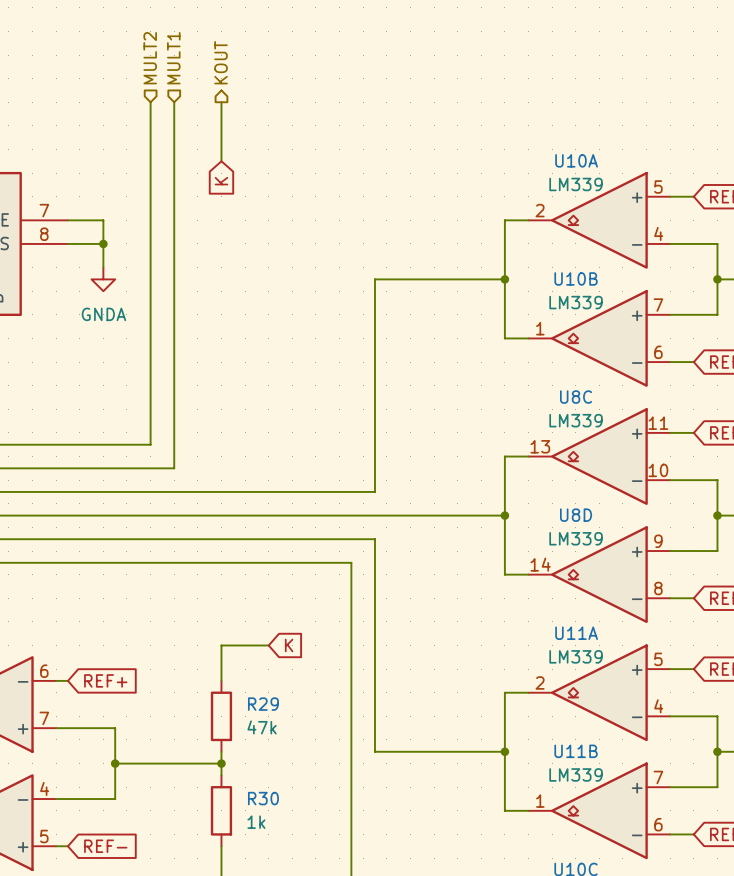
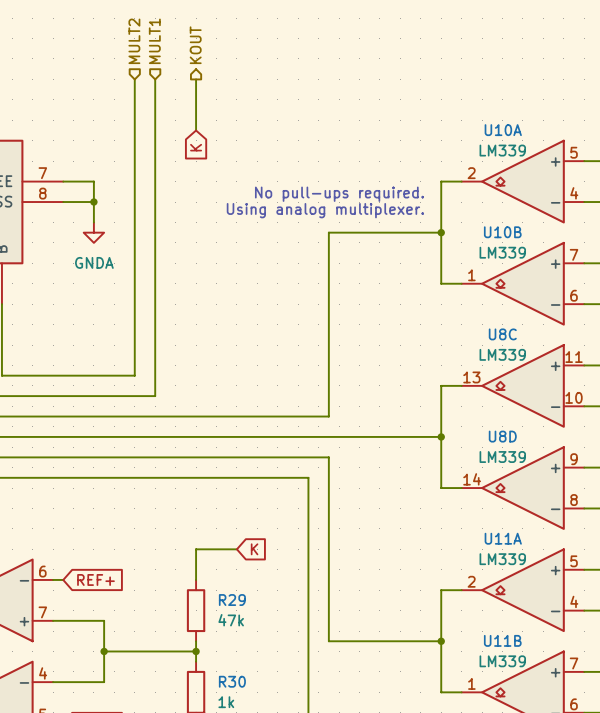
text: none -> No pull-ups required. (339, 194)
text: none -> Using analog multiplexer. (325, 210)

